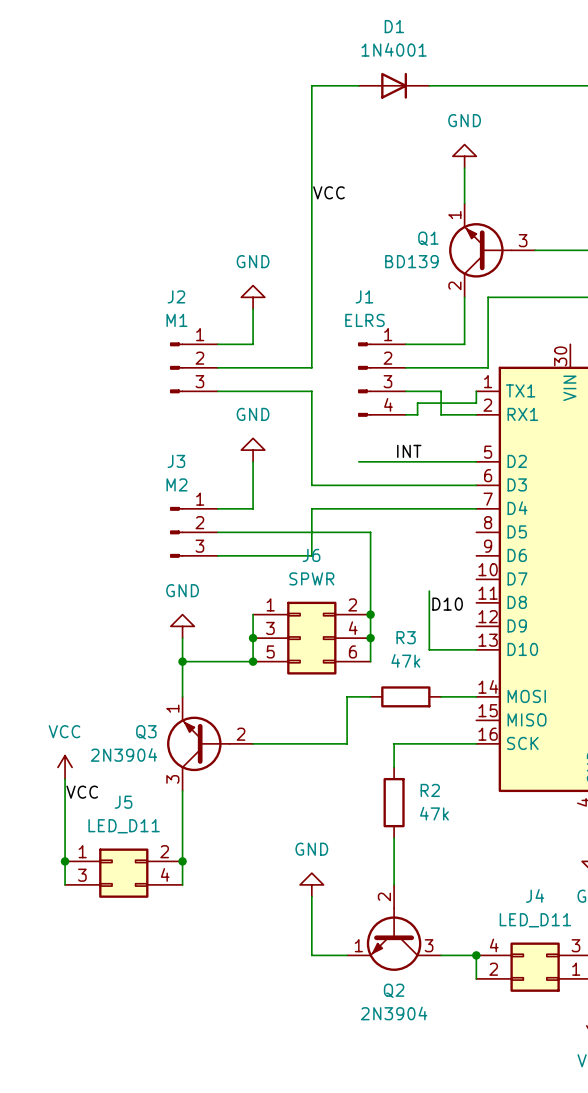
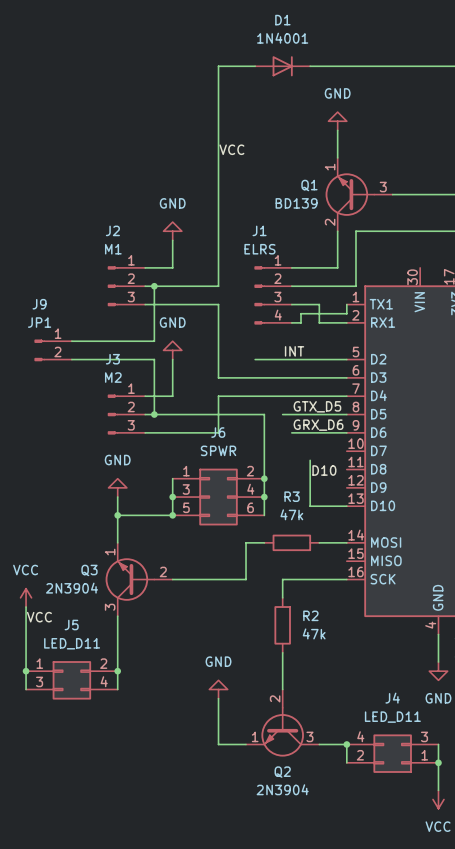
wire: none -> (154, 286) (154, 341) (71, 341)
junction: none -> (154, 286)
J9: none -> JP1 (53, 350)
wire: none -> (71, 359) (154, 359) (154, 414)
label: none -> GTX_D5 (317, 406)
junction: none -> (154, 414)
wire: none -> (282, 414) (346, 414)
label: none -> GRX_D6 (318, 425)
wire: none -> (291, 432) (346, 432)

